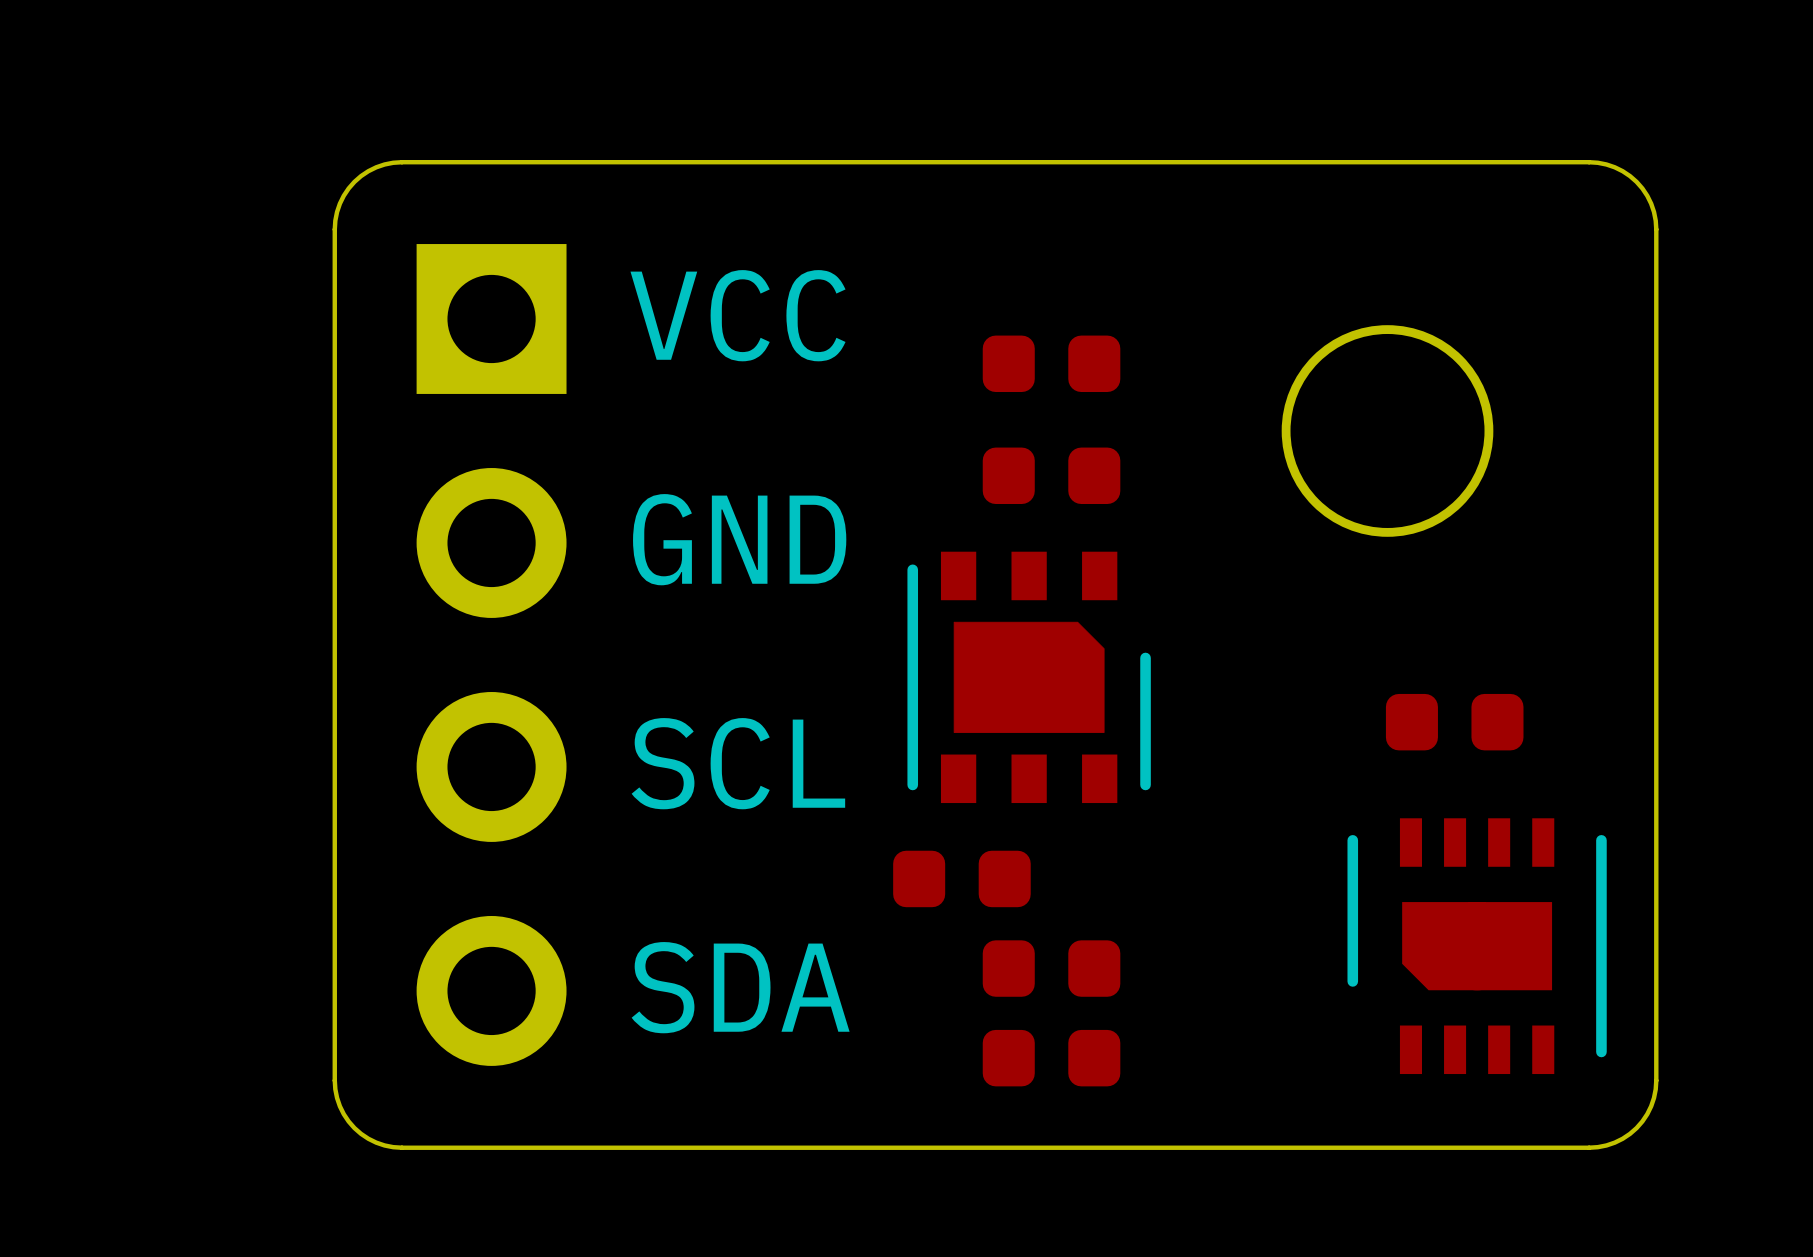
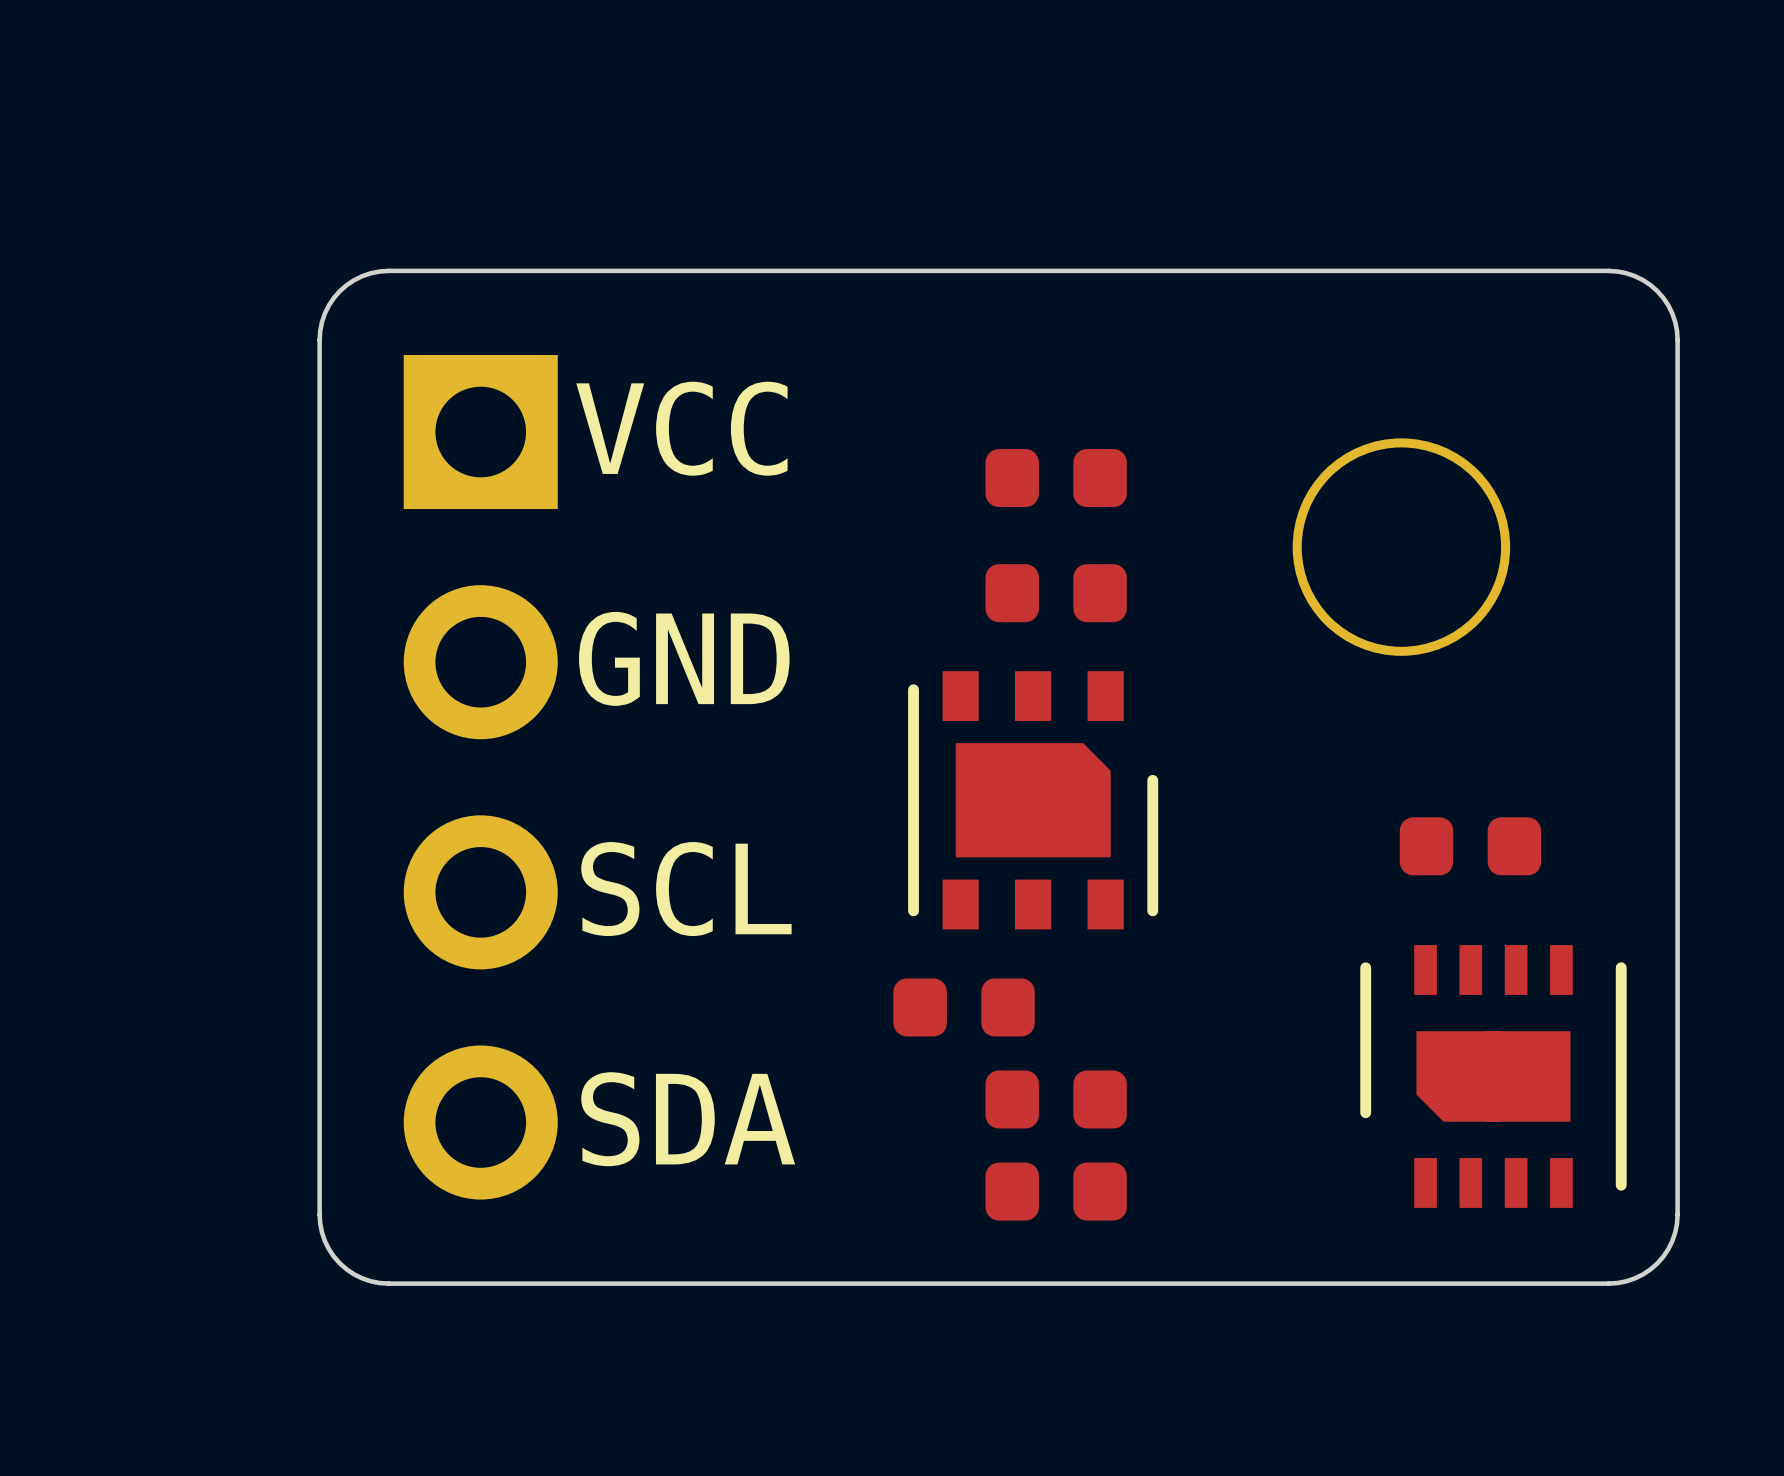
text position: VCC (738, 315) -> VCC (681, 428)
text position: GND (739, 539) -> GND (684, 658)
text position: SCL (738, 763) -> SCL (686, 889)
text position: SDA (740, 987) -> SDA (688, 1119)

